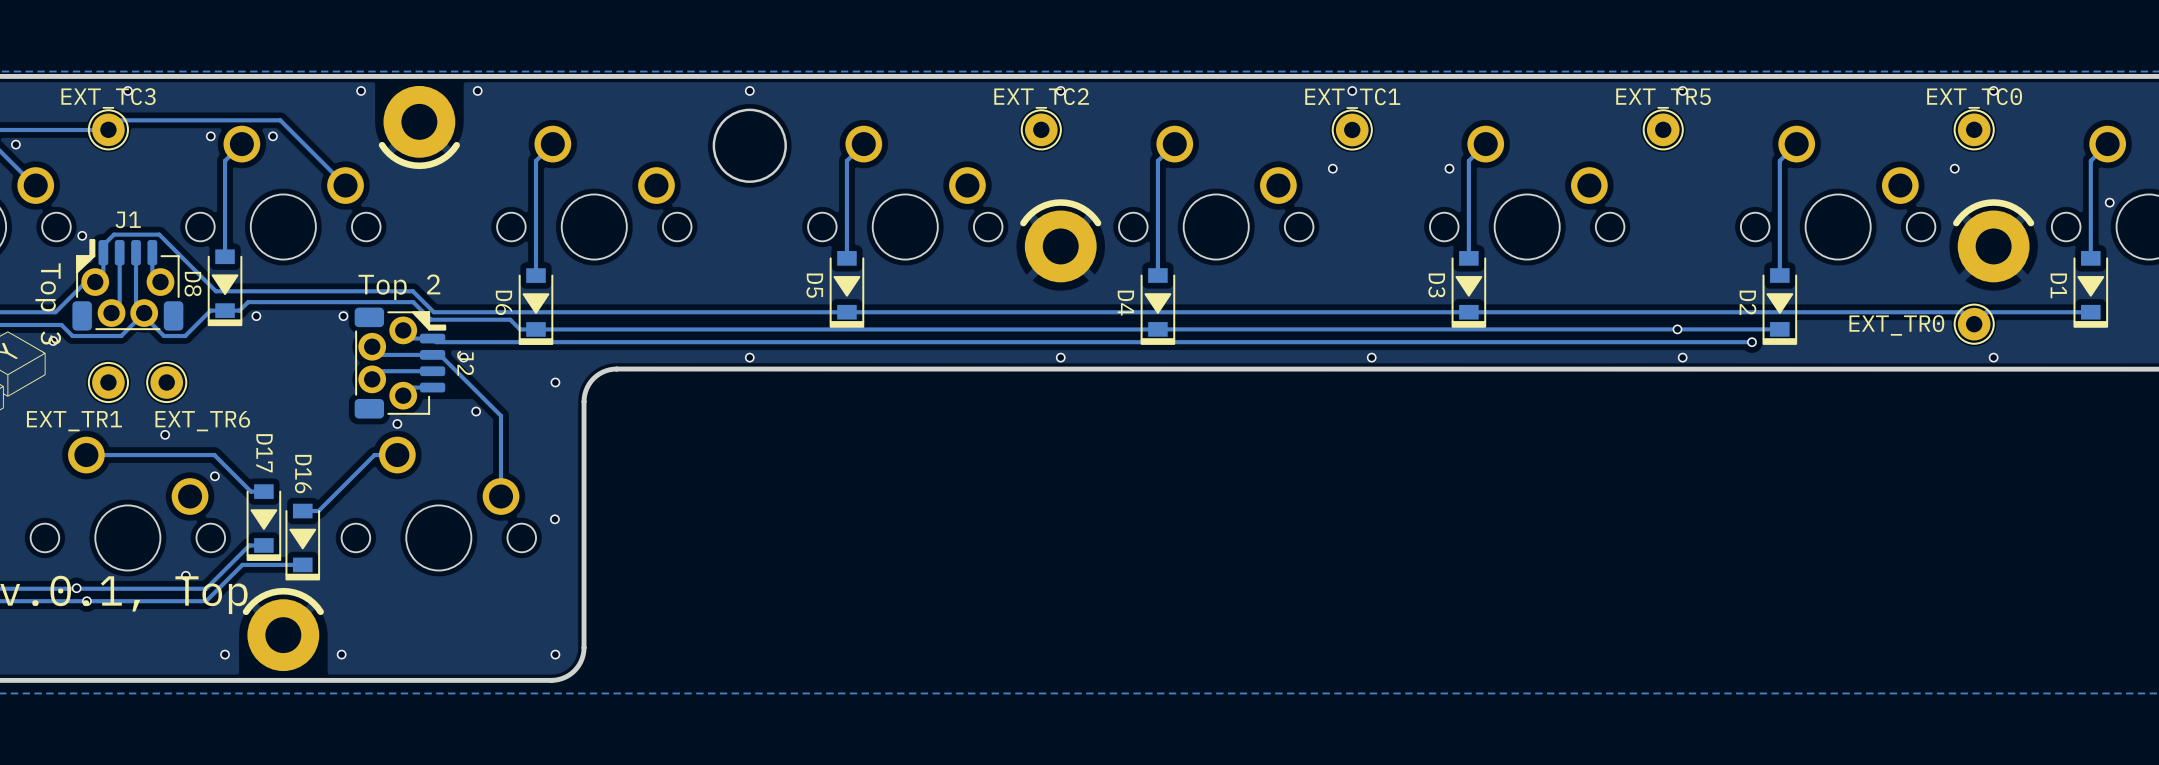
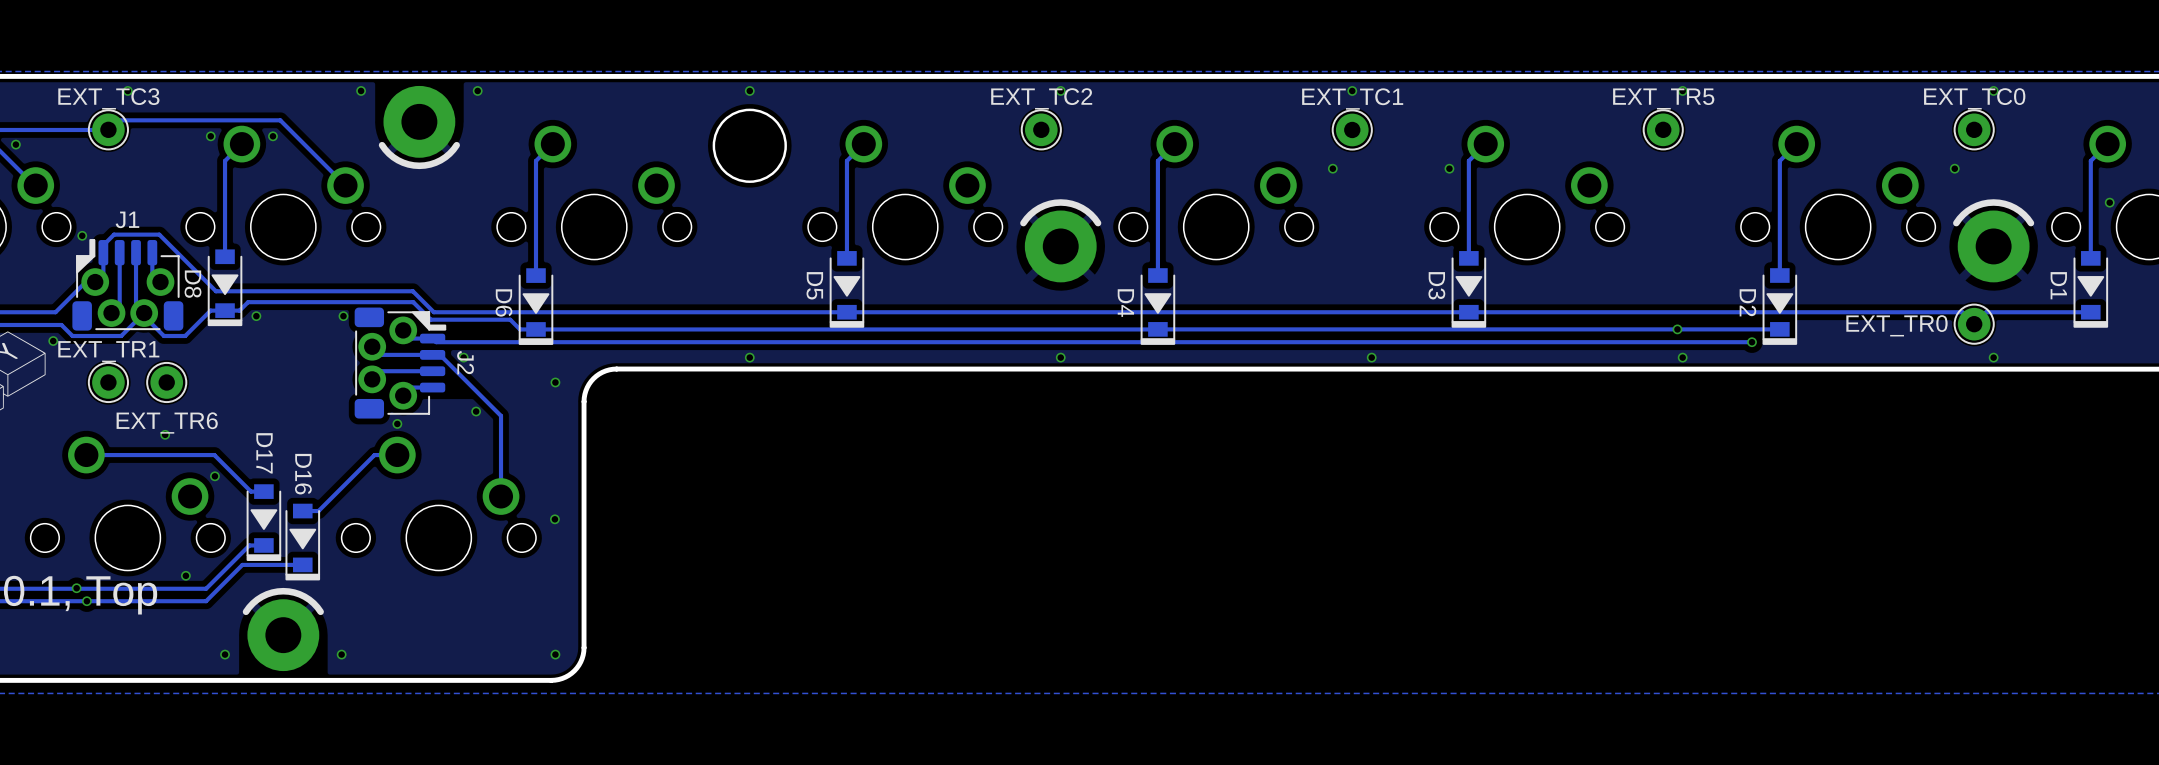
text: Top 2 (399, 287) -> none
text: Top 3 (48, 303) -> none
EXT_TR1 name position: EXT_TR1 (74, 421) -> EXT_TR1 (108, 351)
EXT_TR6 name position: EXT_TR6 (202, 421) -> EXT_TR6 (167, 422)

